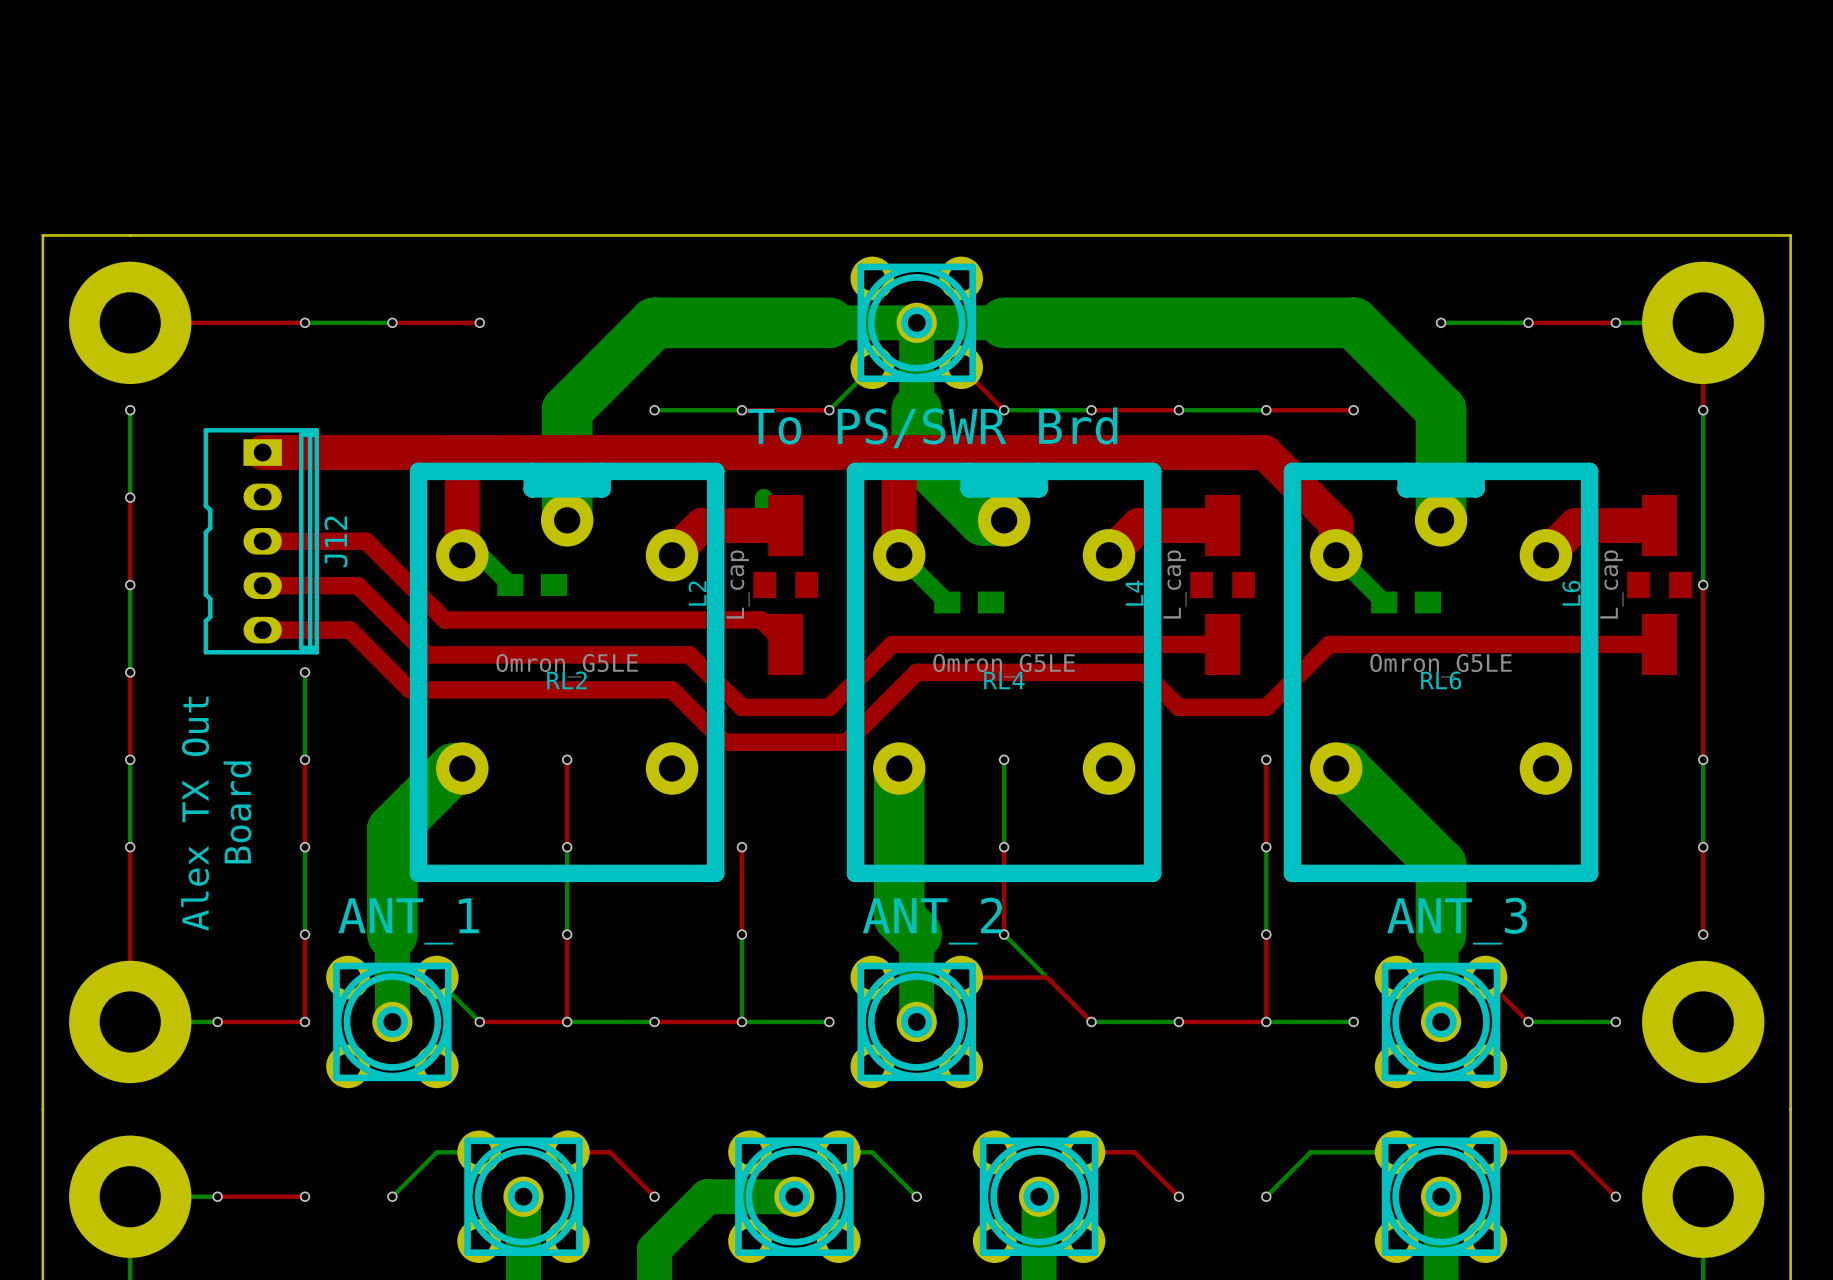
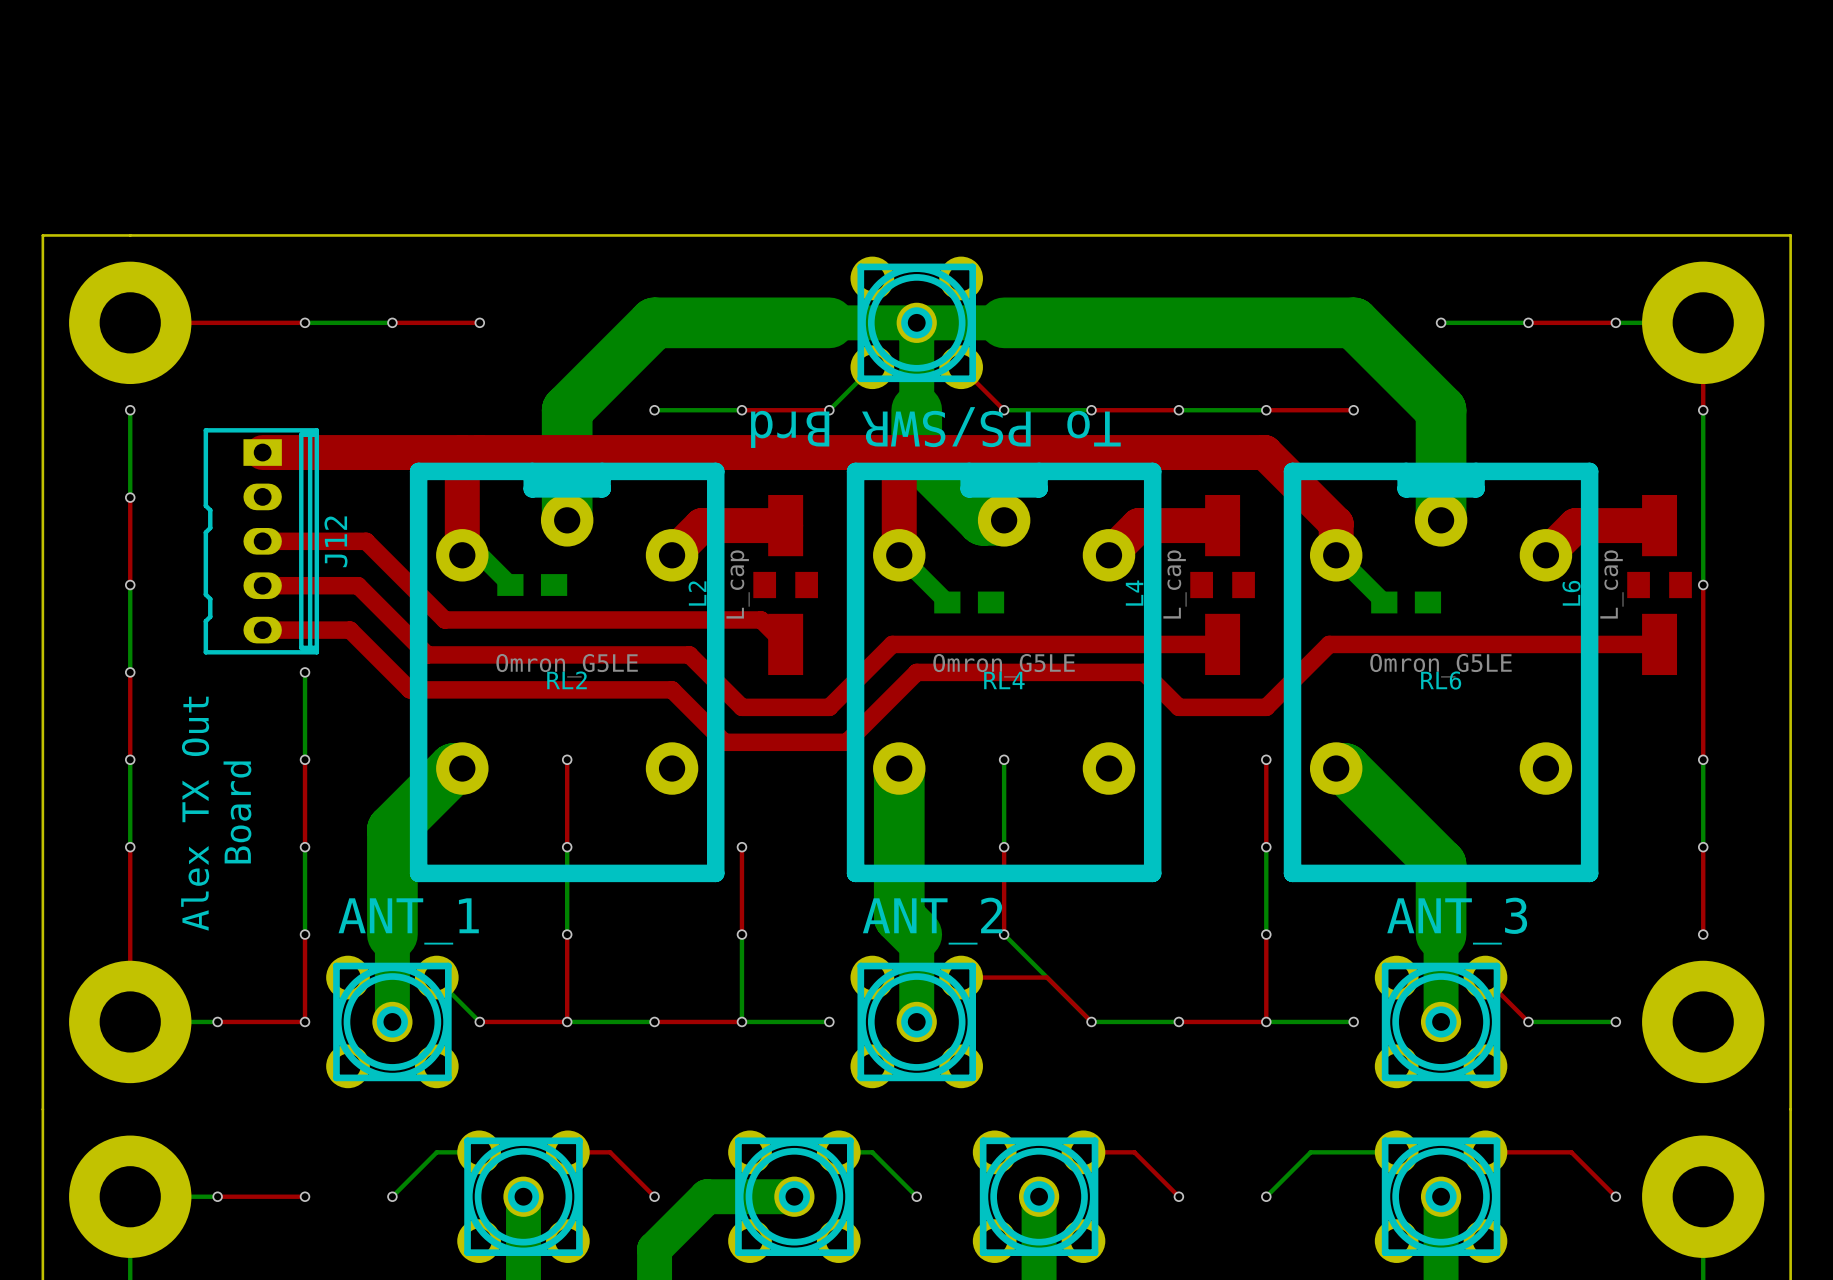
text rotation: 0° (932, 427) -> 180° (935, 427)
bottom track: (763, 497) (763, 507) -> none

